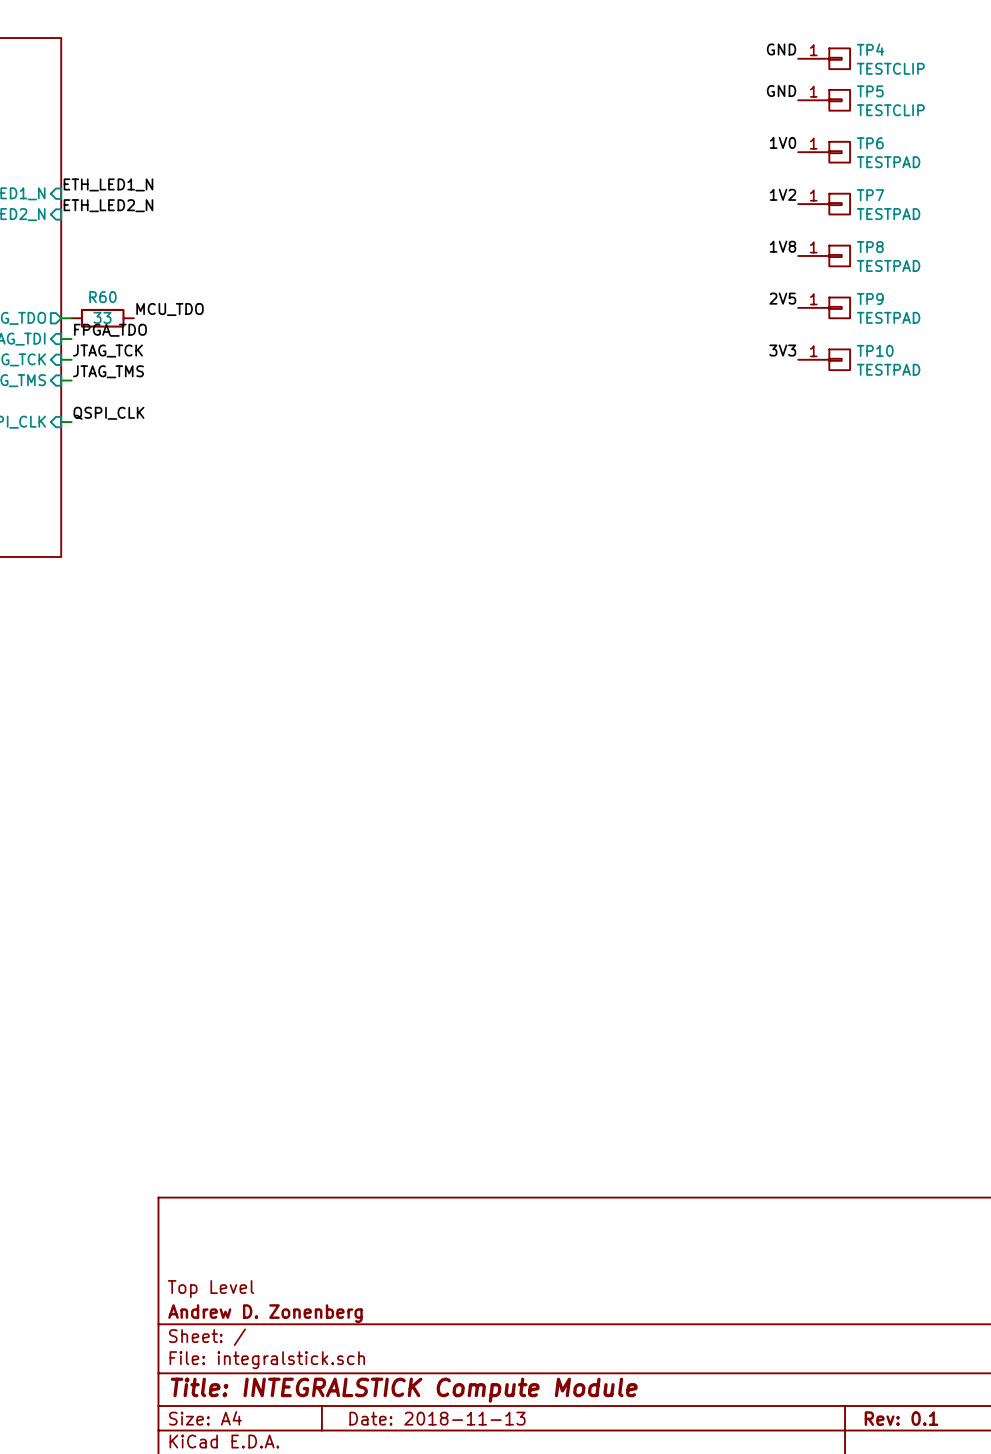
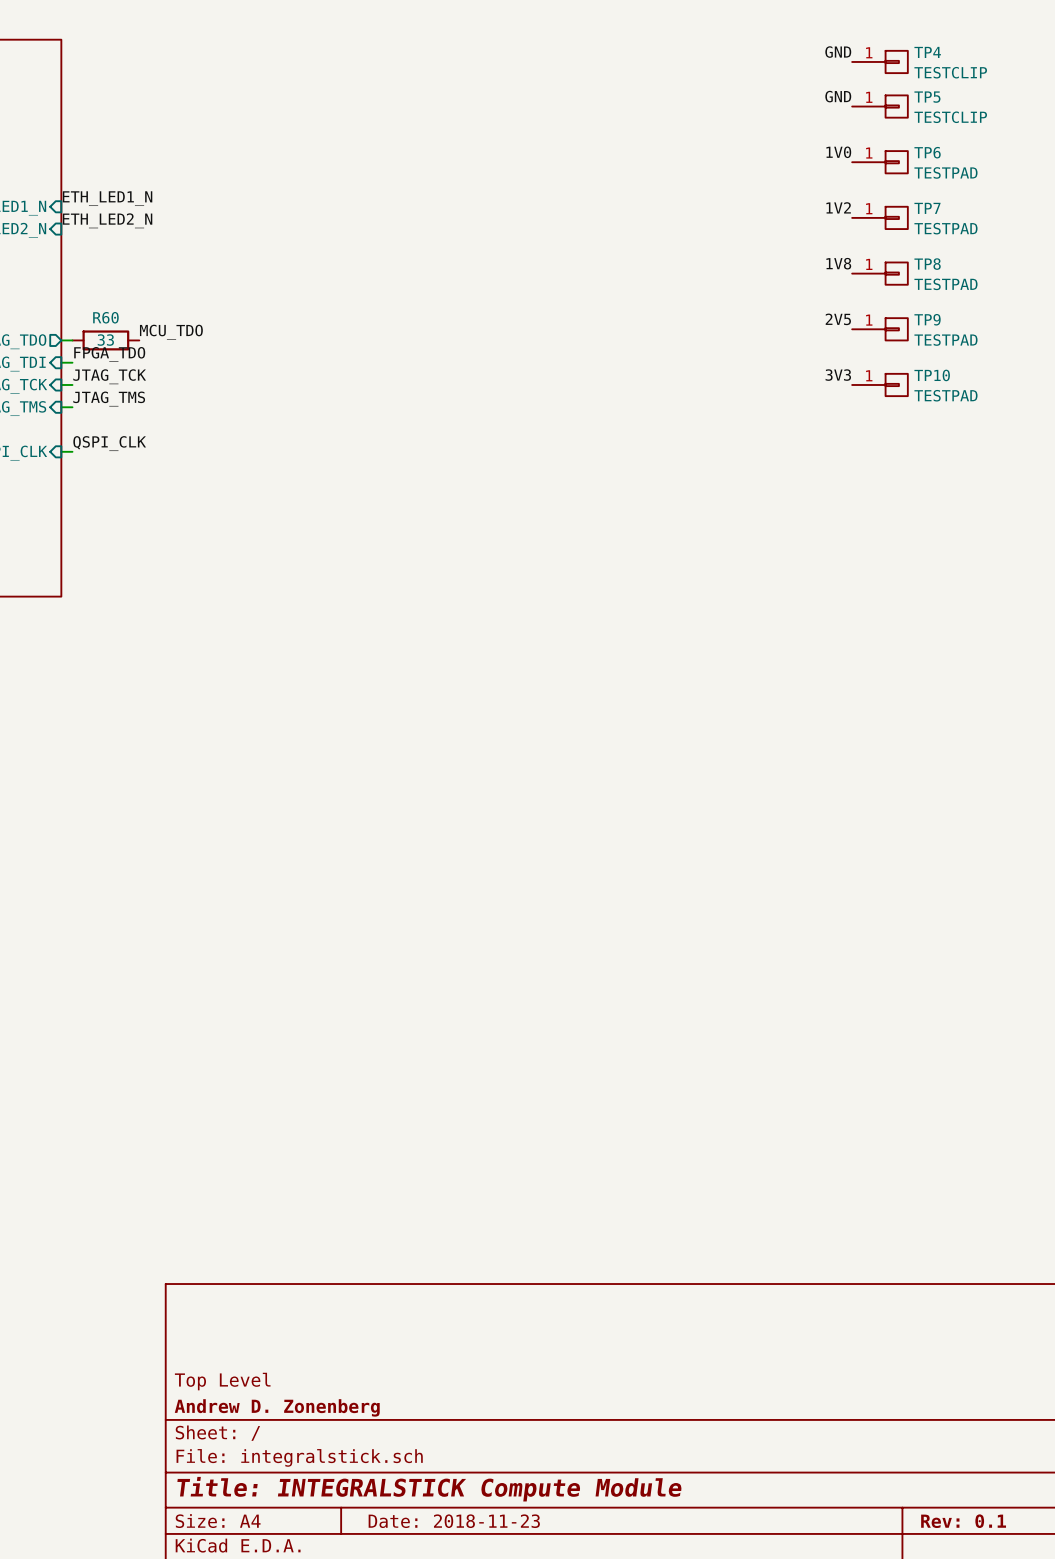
title block: Date: 2018-11-13 (437, 1418) -> Date: 2018-11-23 (454, 1521)

